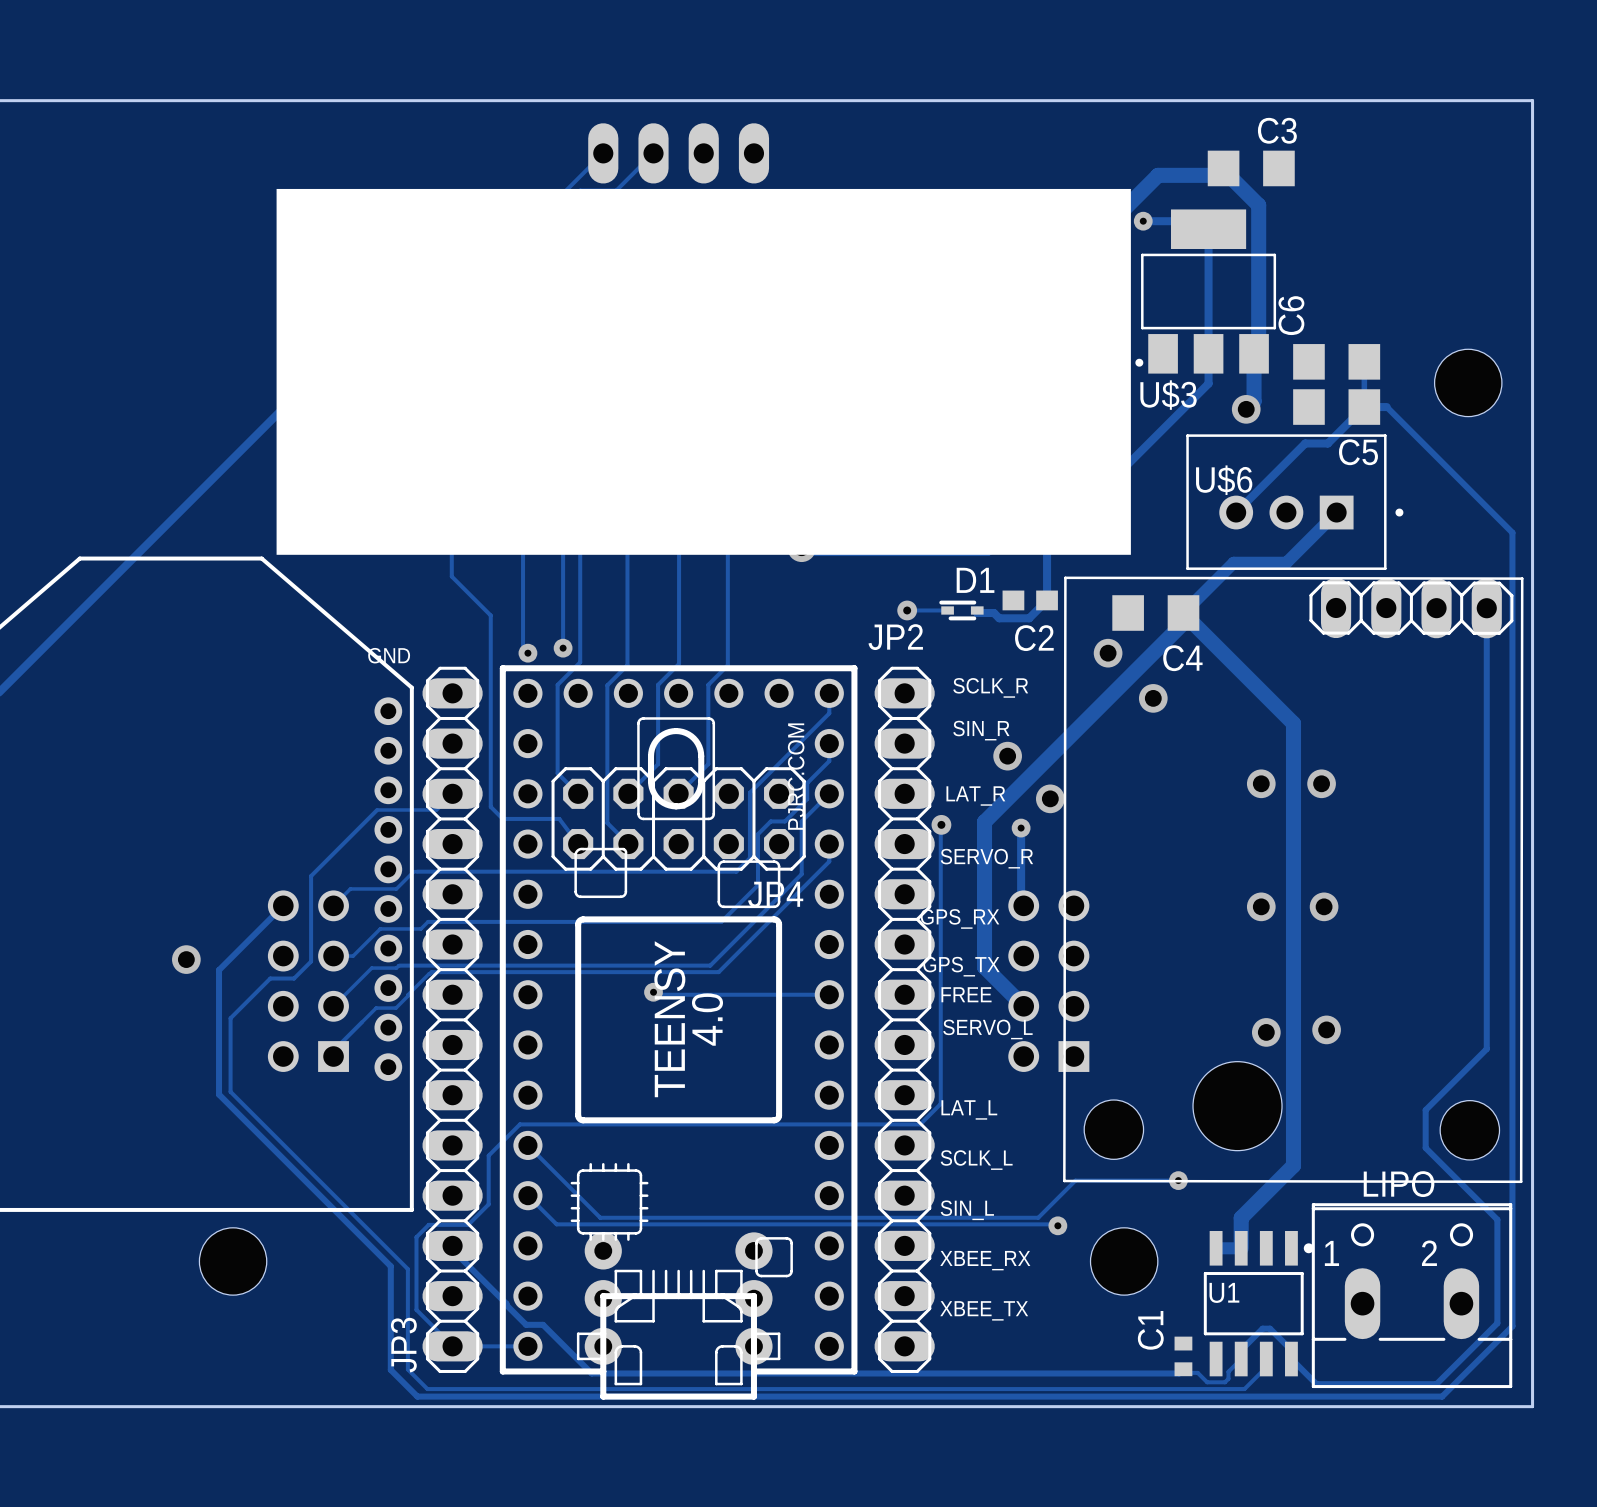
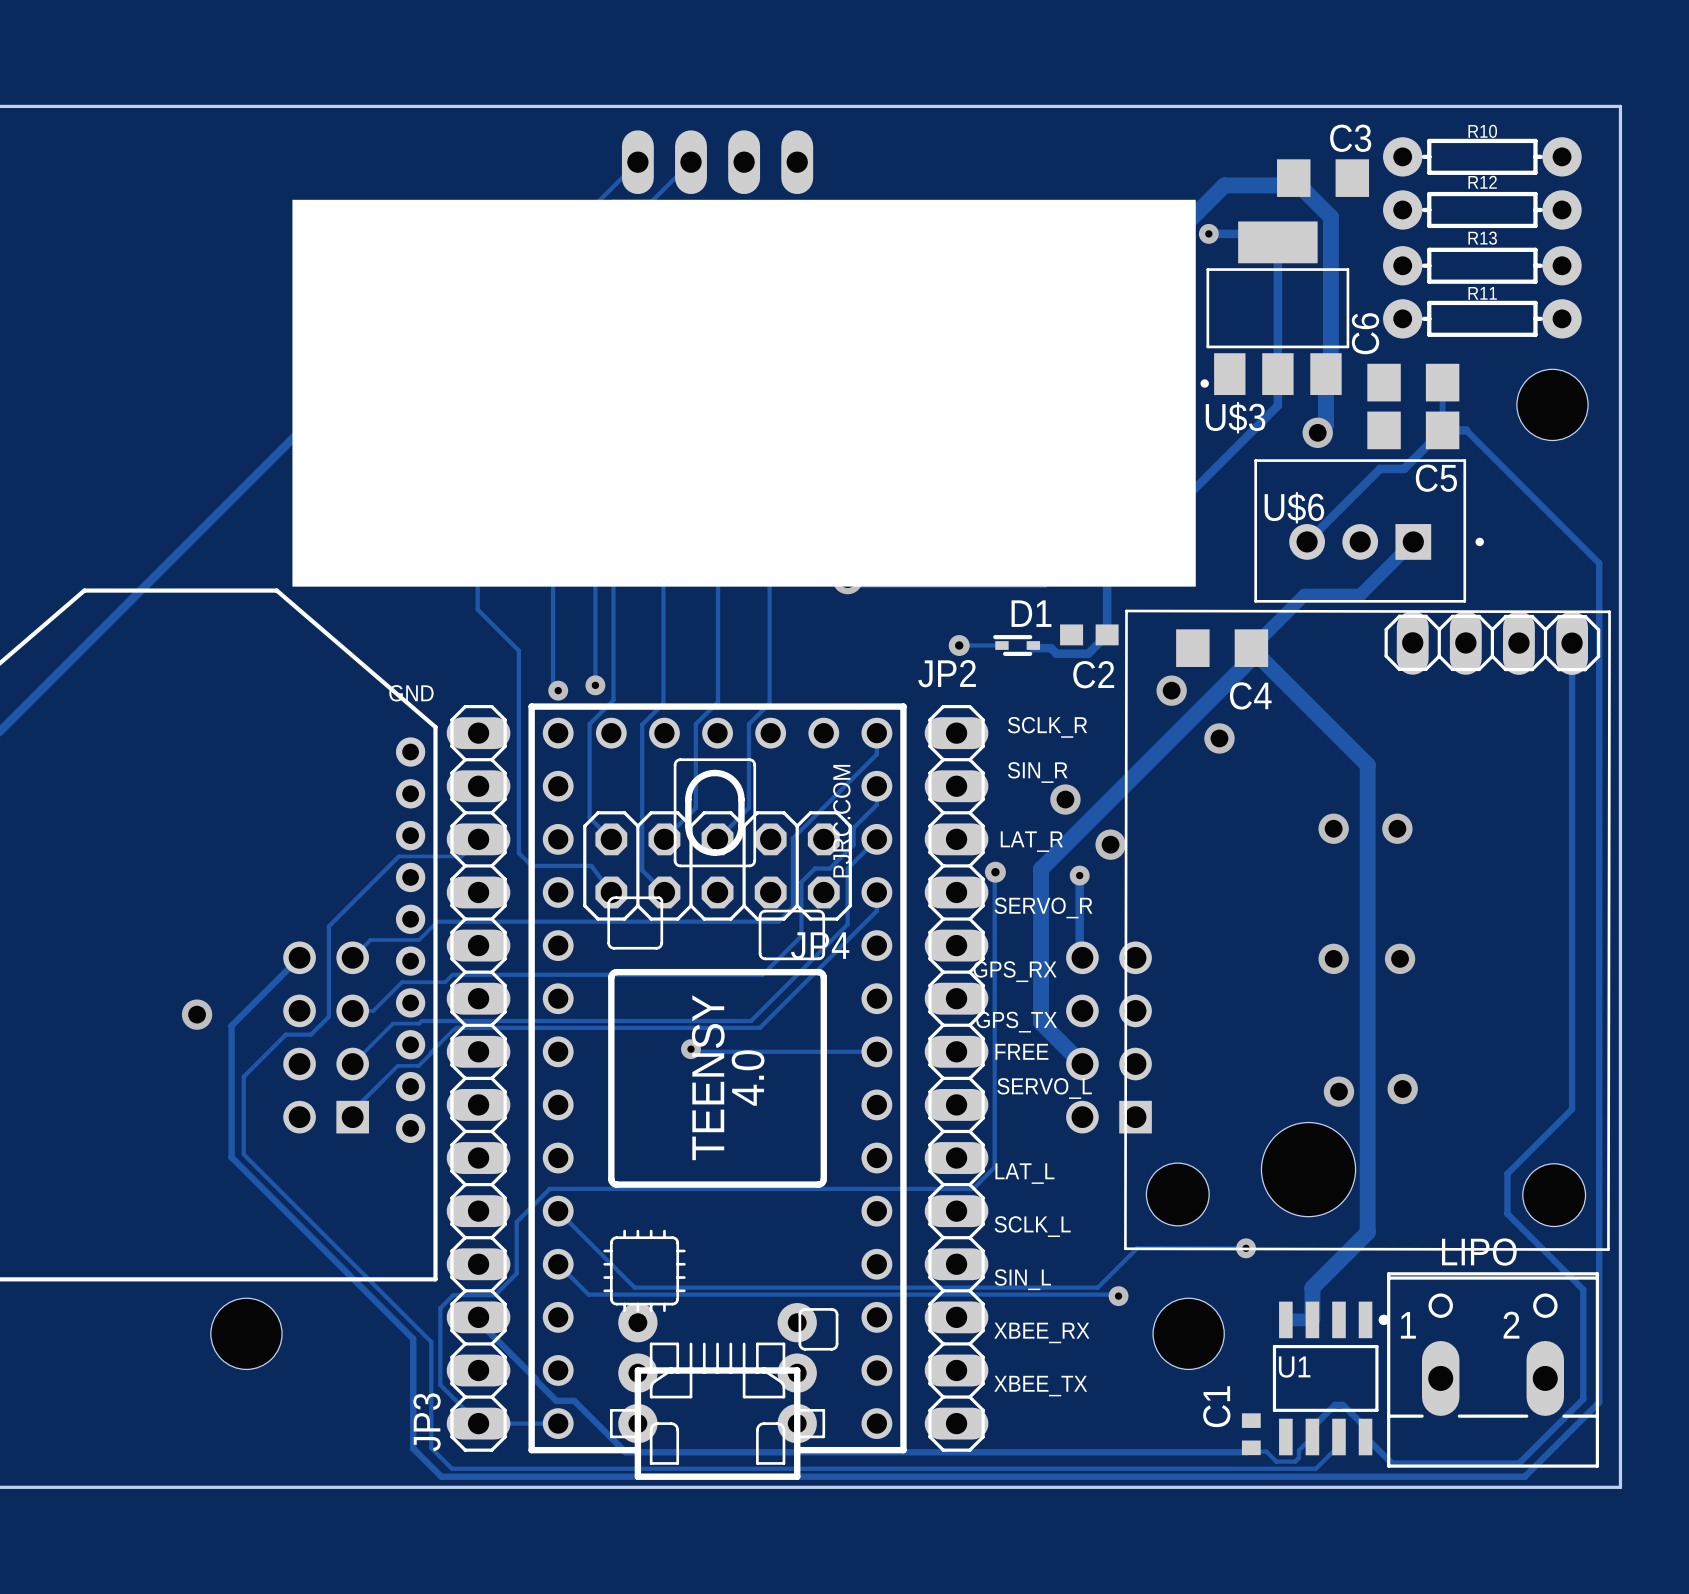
R10: none -> (1482, 156)
R12: none -> (1482, 209)
R13: none -> (1482, 265)
R11: none -> (1482, 318)

